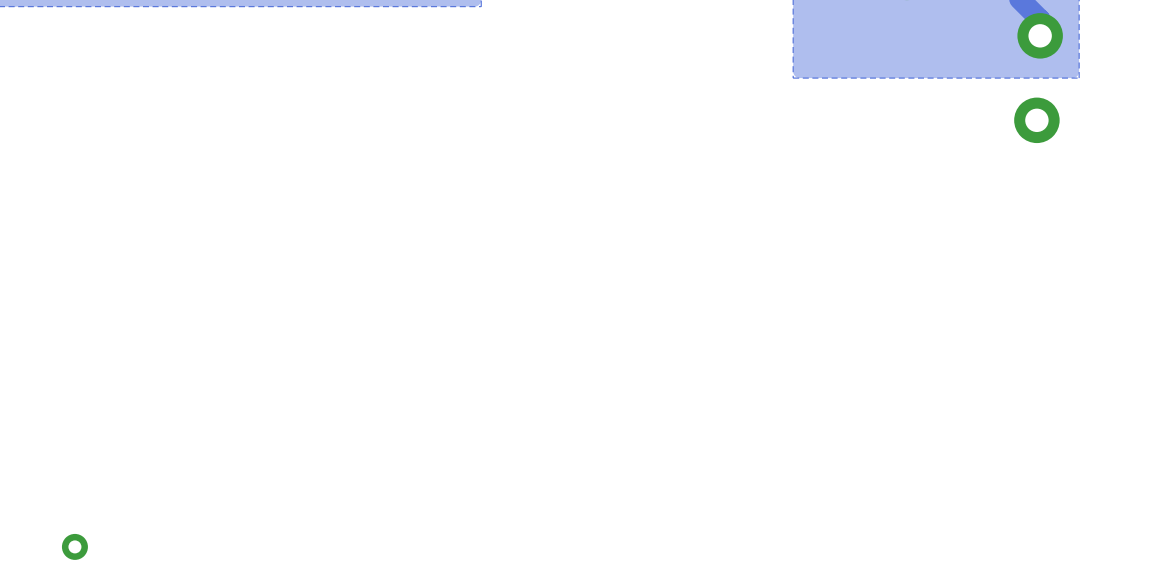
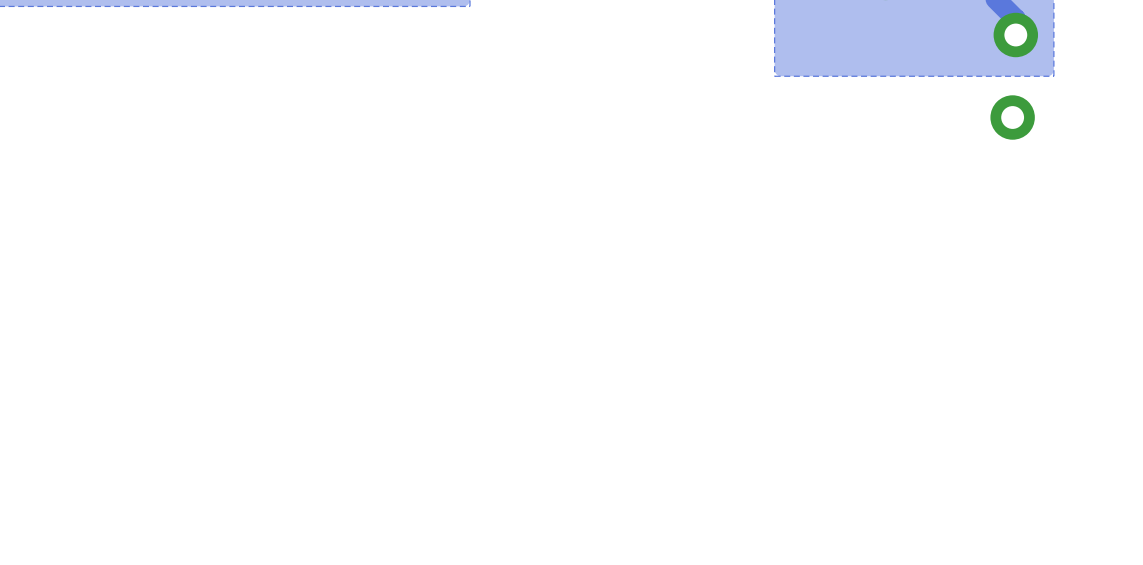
via: (74, 546) -> none

